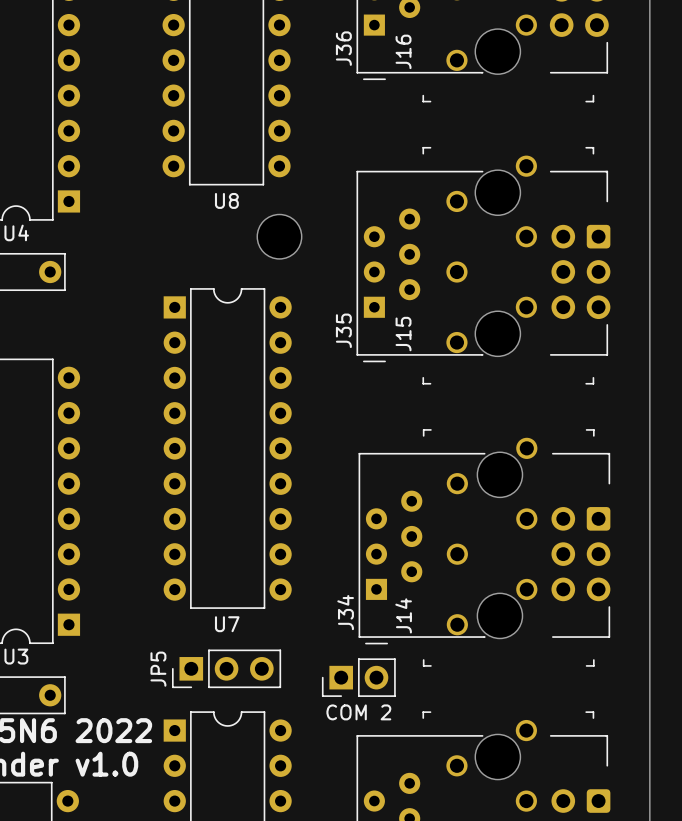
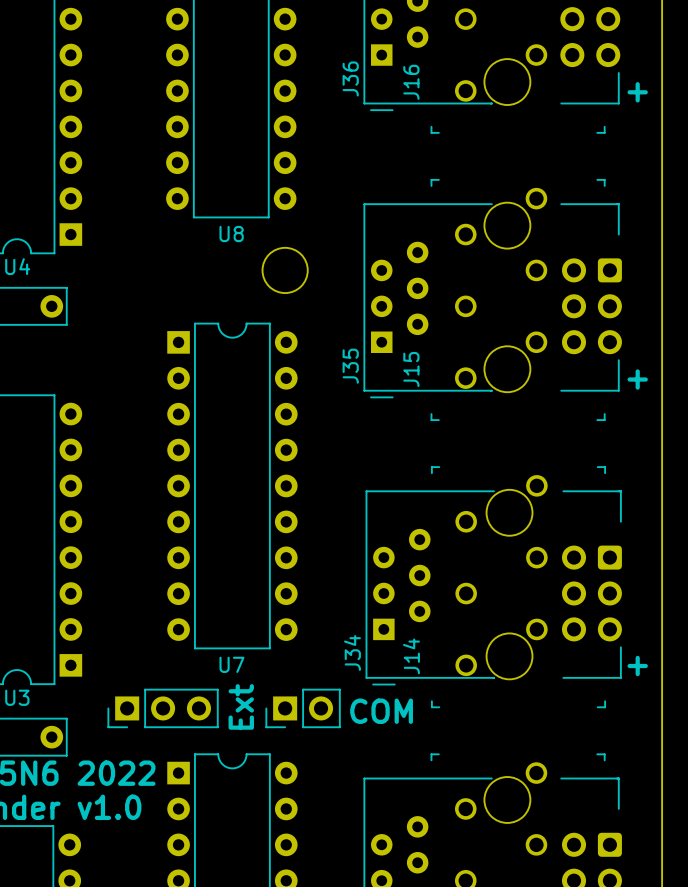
text: none -> + (637, 92)
text: none -> + (637, 379)
text: none -> + (637, 666)
text: none -> Ext (241, 706)
part: none -> (163, 708)
part: none -> (303, 708)
JP5: (226, 668) -> none
text: none -> COM (381, 711)
part: COM 2 (358, 677) -> none

